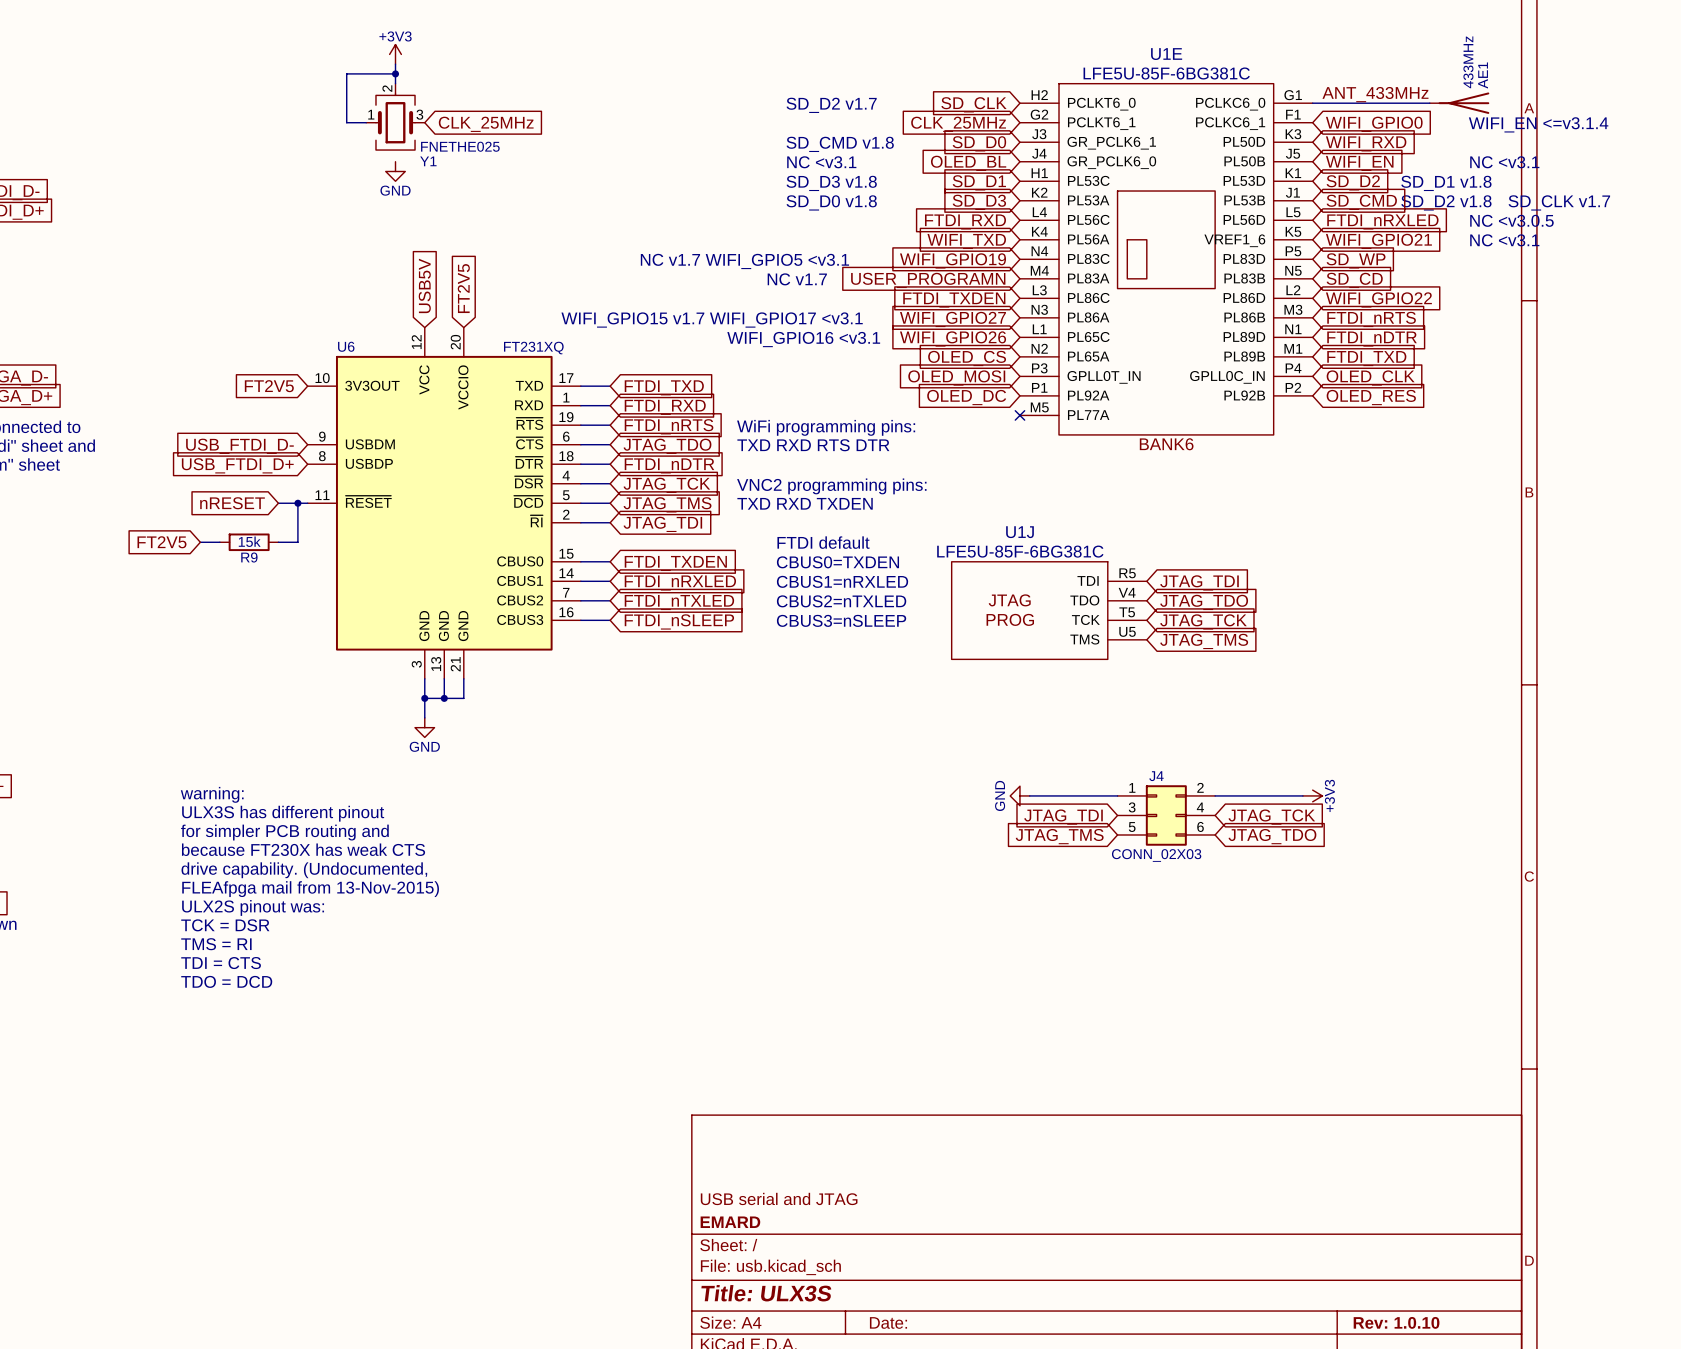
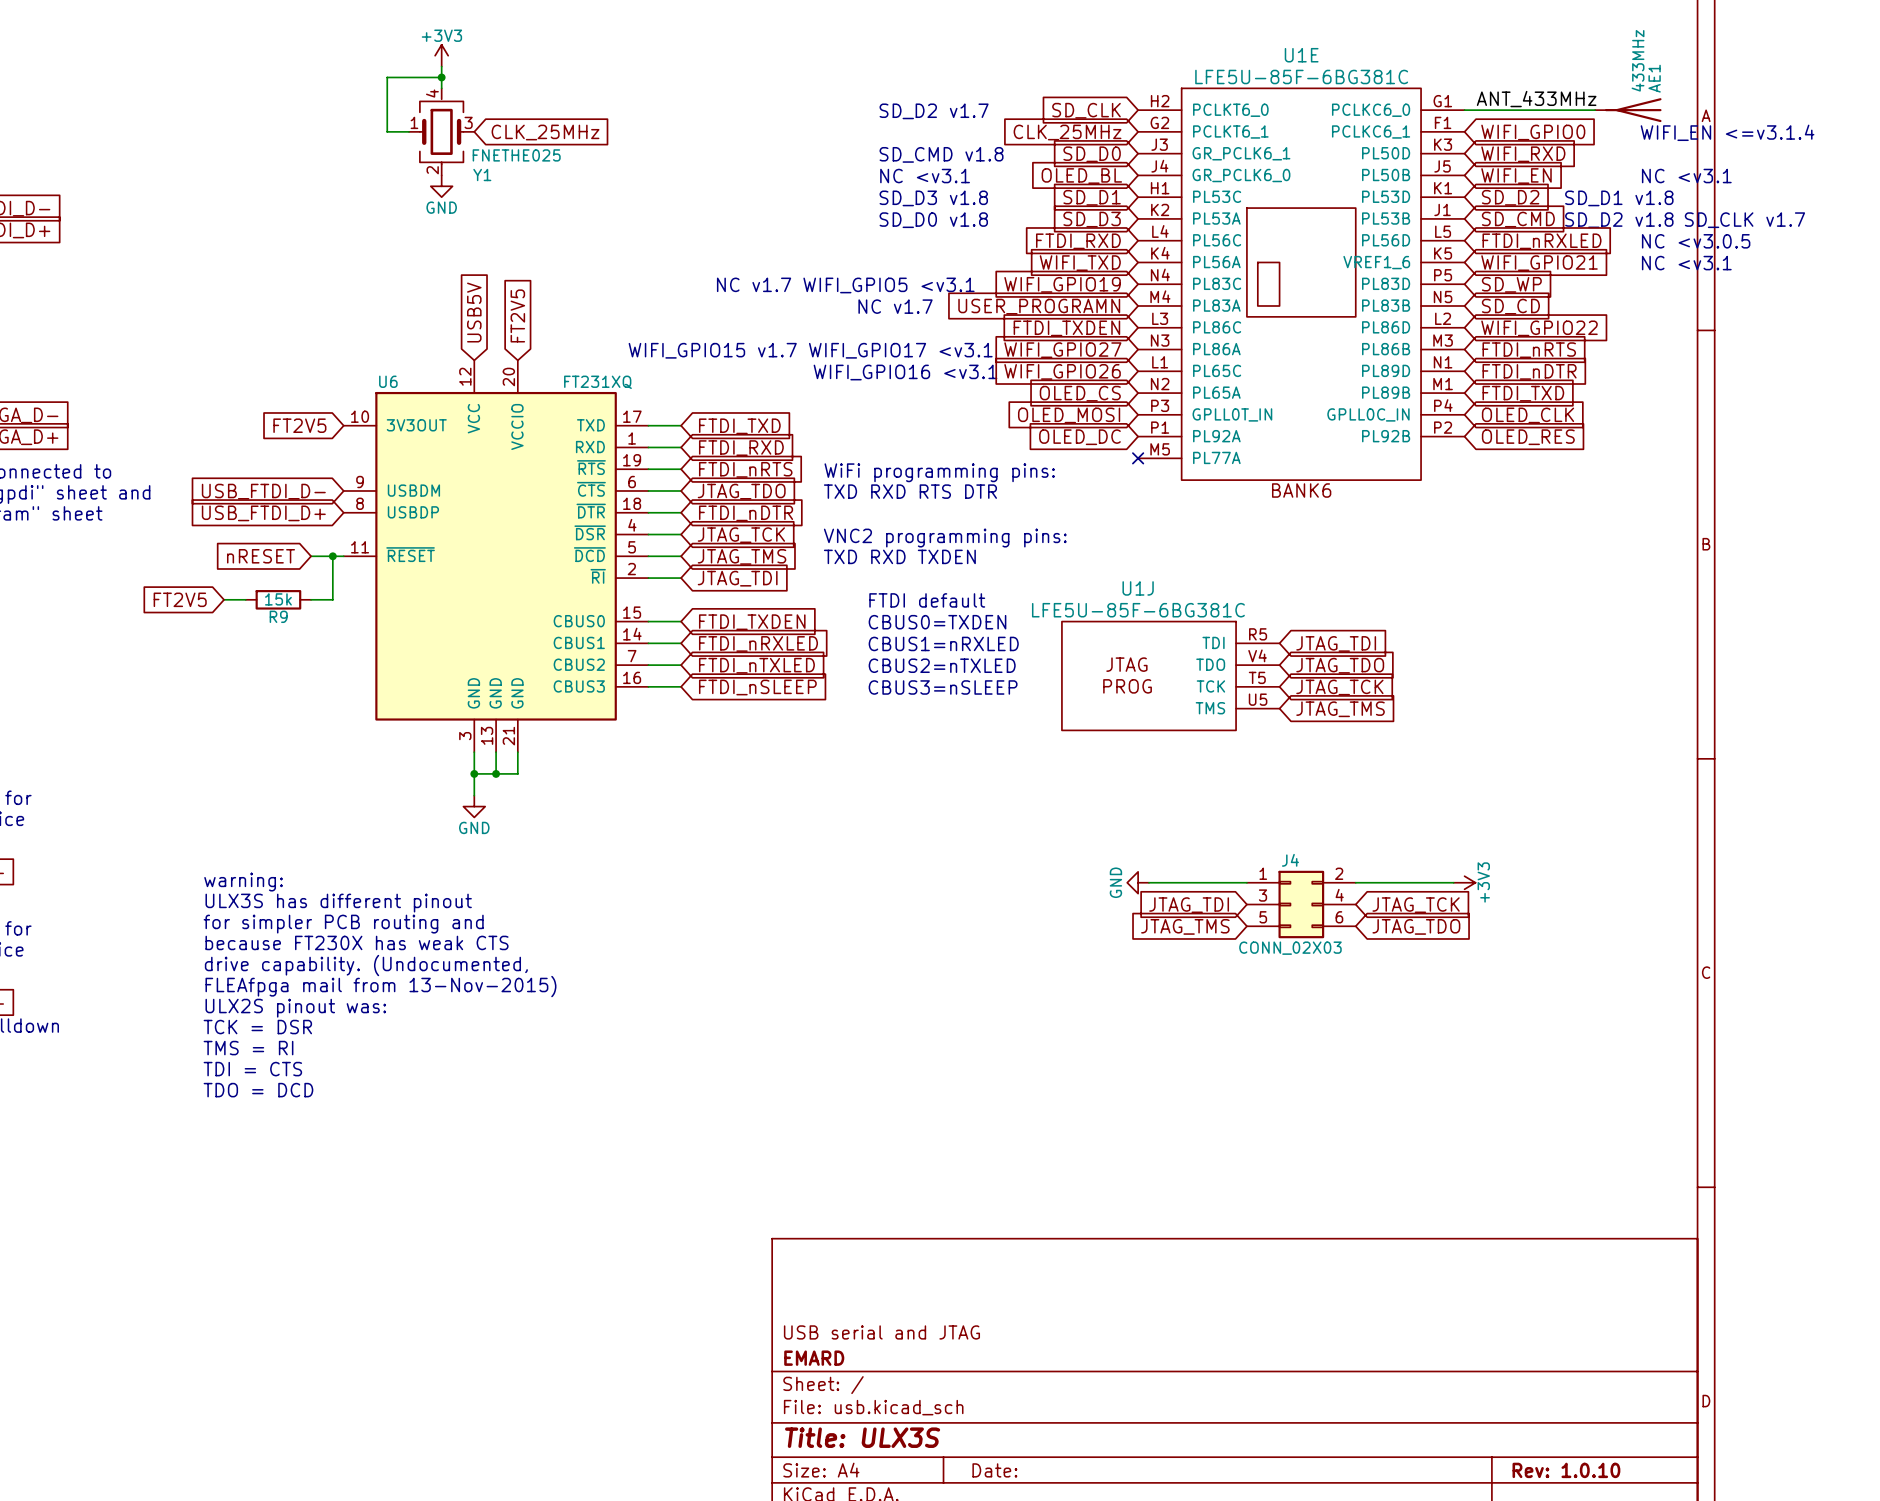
Y1 symbol: [366, 83, 425, 151] -> [409, 88, 475, 176]

